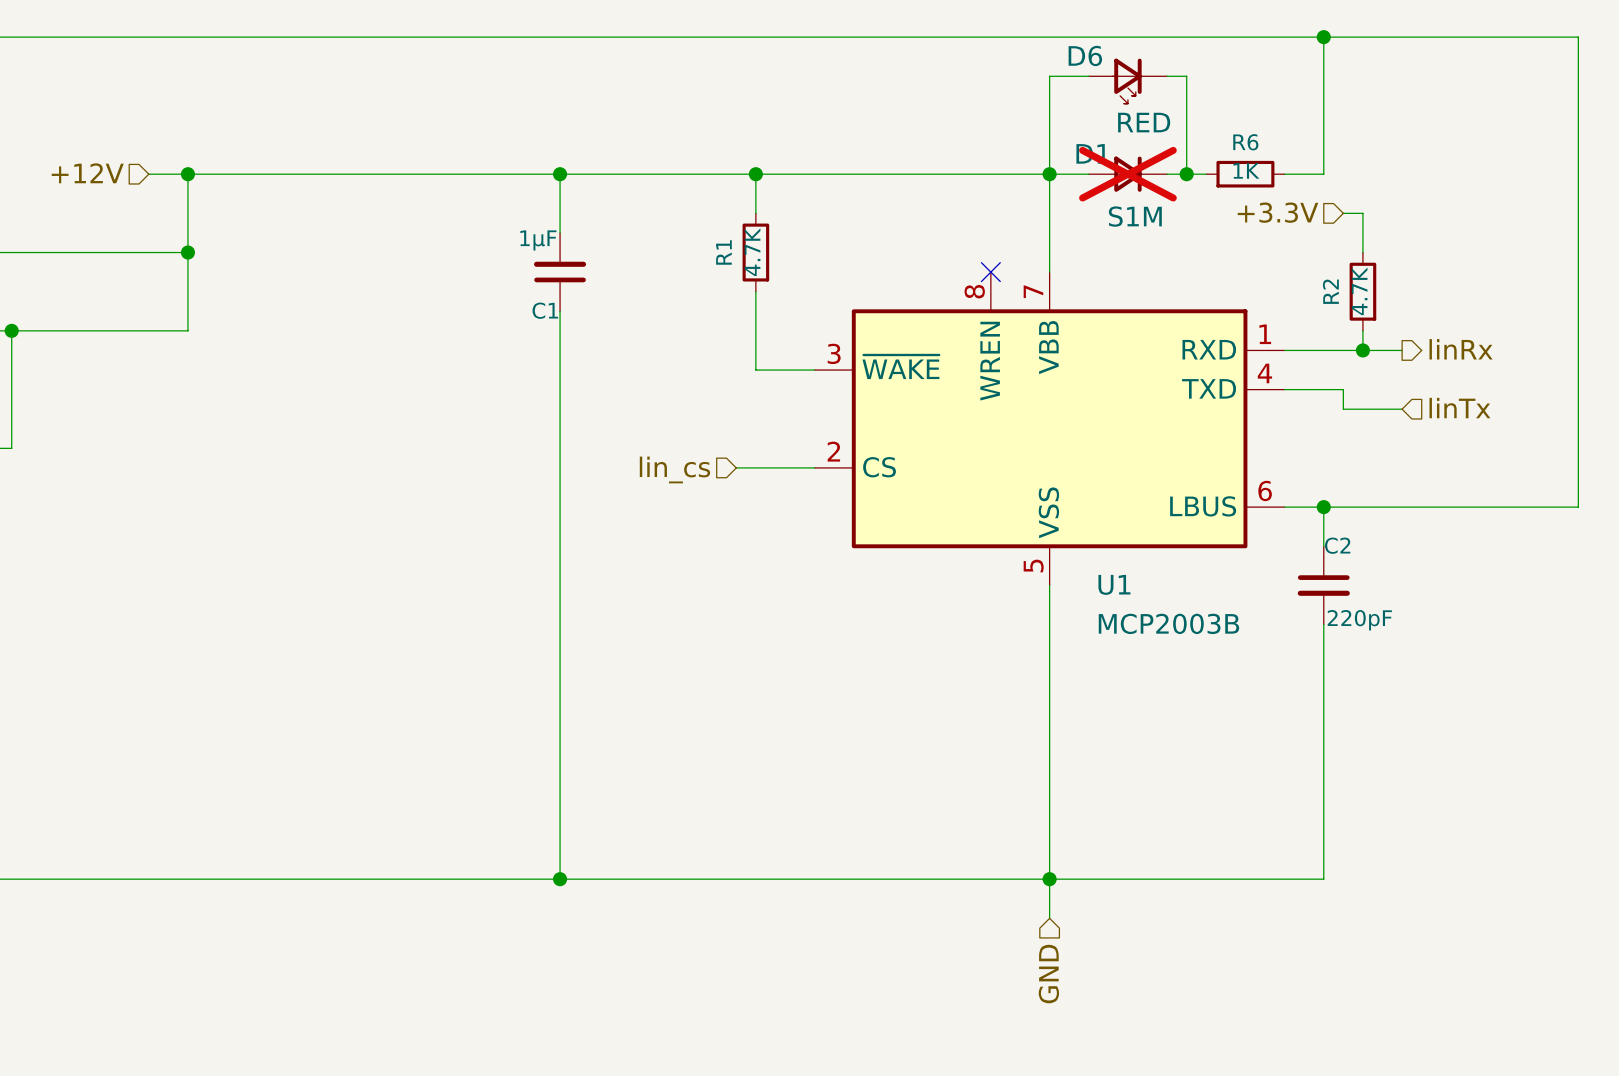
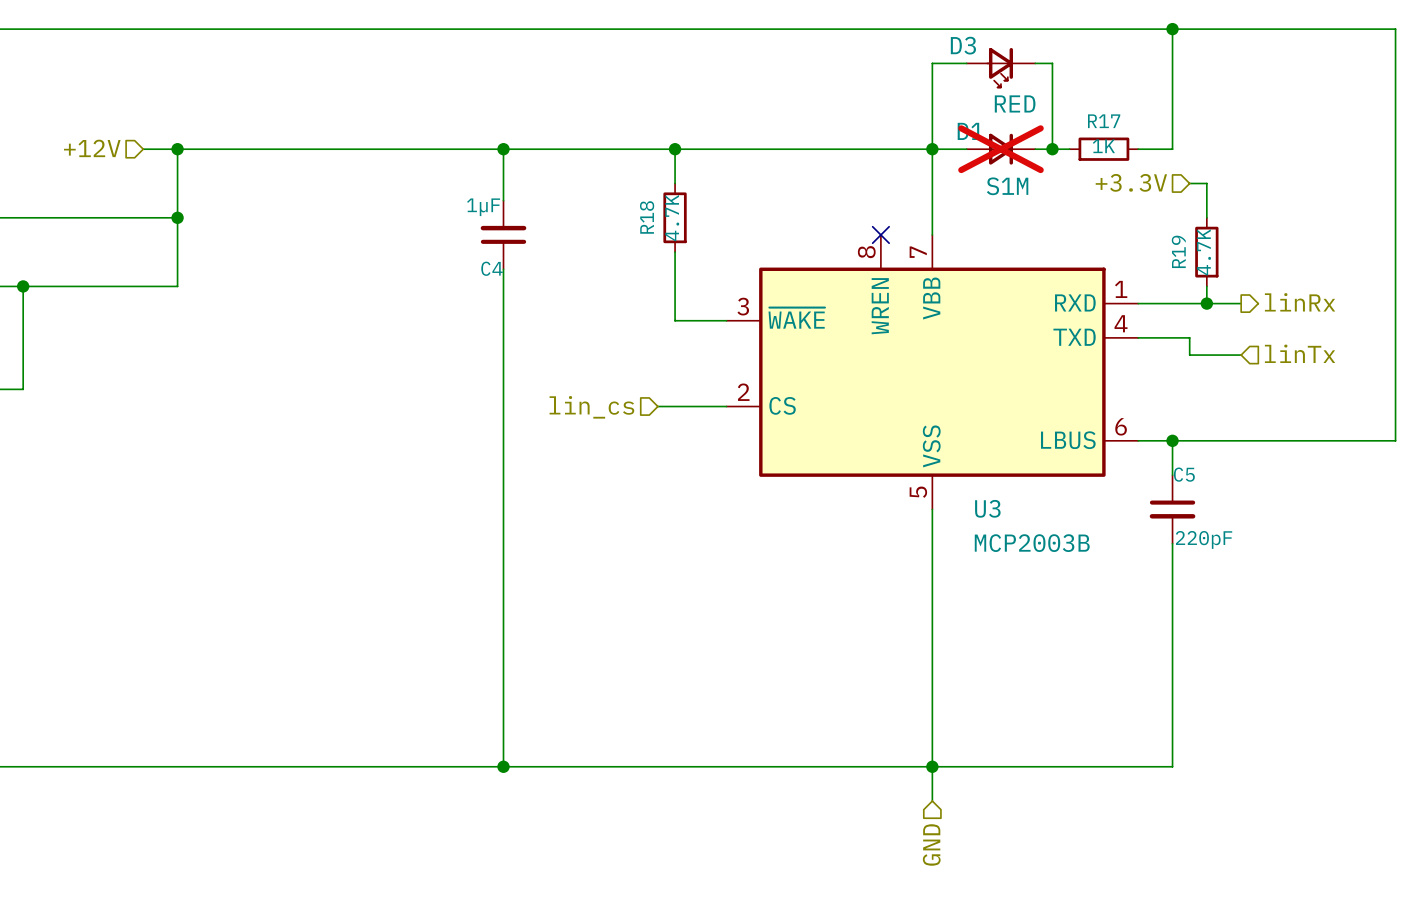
D6 name: D6 (1085, 55) -> D3 (963, 45)
R6 name: R6 (1245, 142) -> R17 (1104, 121)
R1 name: R1 (723, 252) -> R18 (647, 217)
R2 name: R2 (1330, 291) -> R19 (1178, 251)
C1 name: C1 (545, 310) -> C4 (492, 268)
C2 name: C2 (1337, 545) -> C5 (1184, 474)
U1 name: U1 (1114, 584) -> U3 (987, 508)

